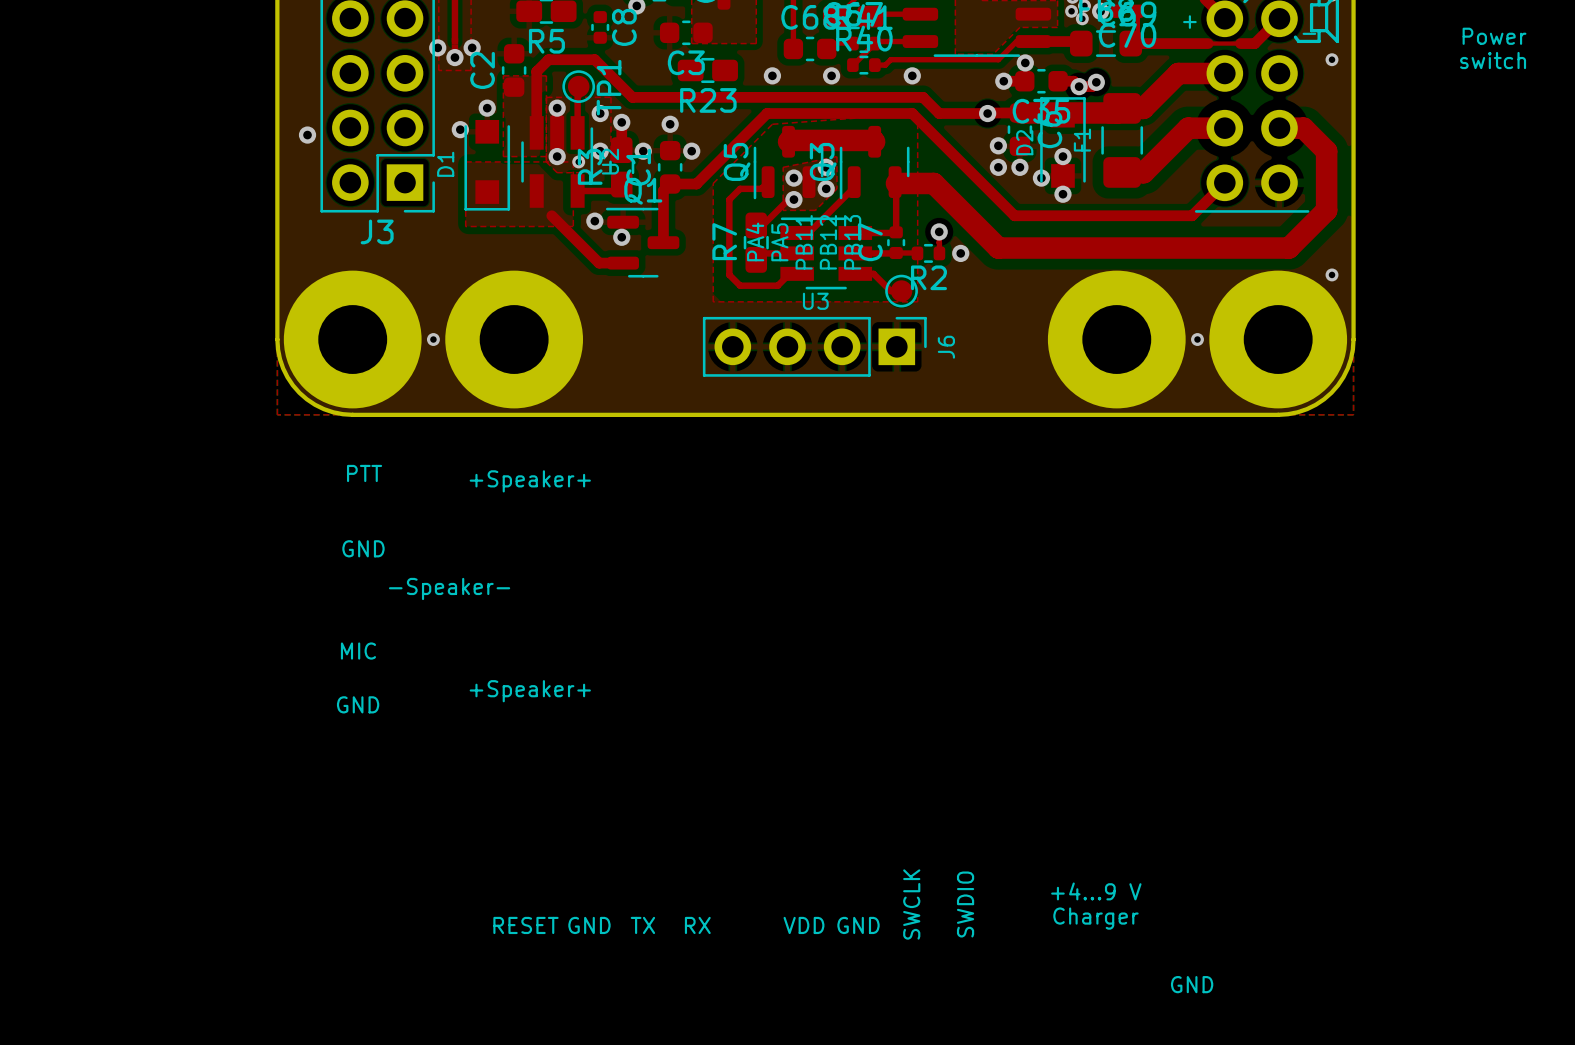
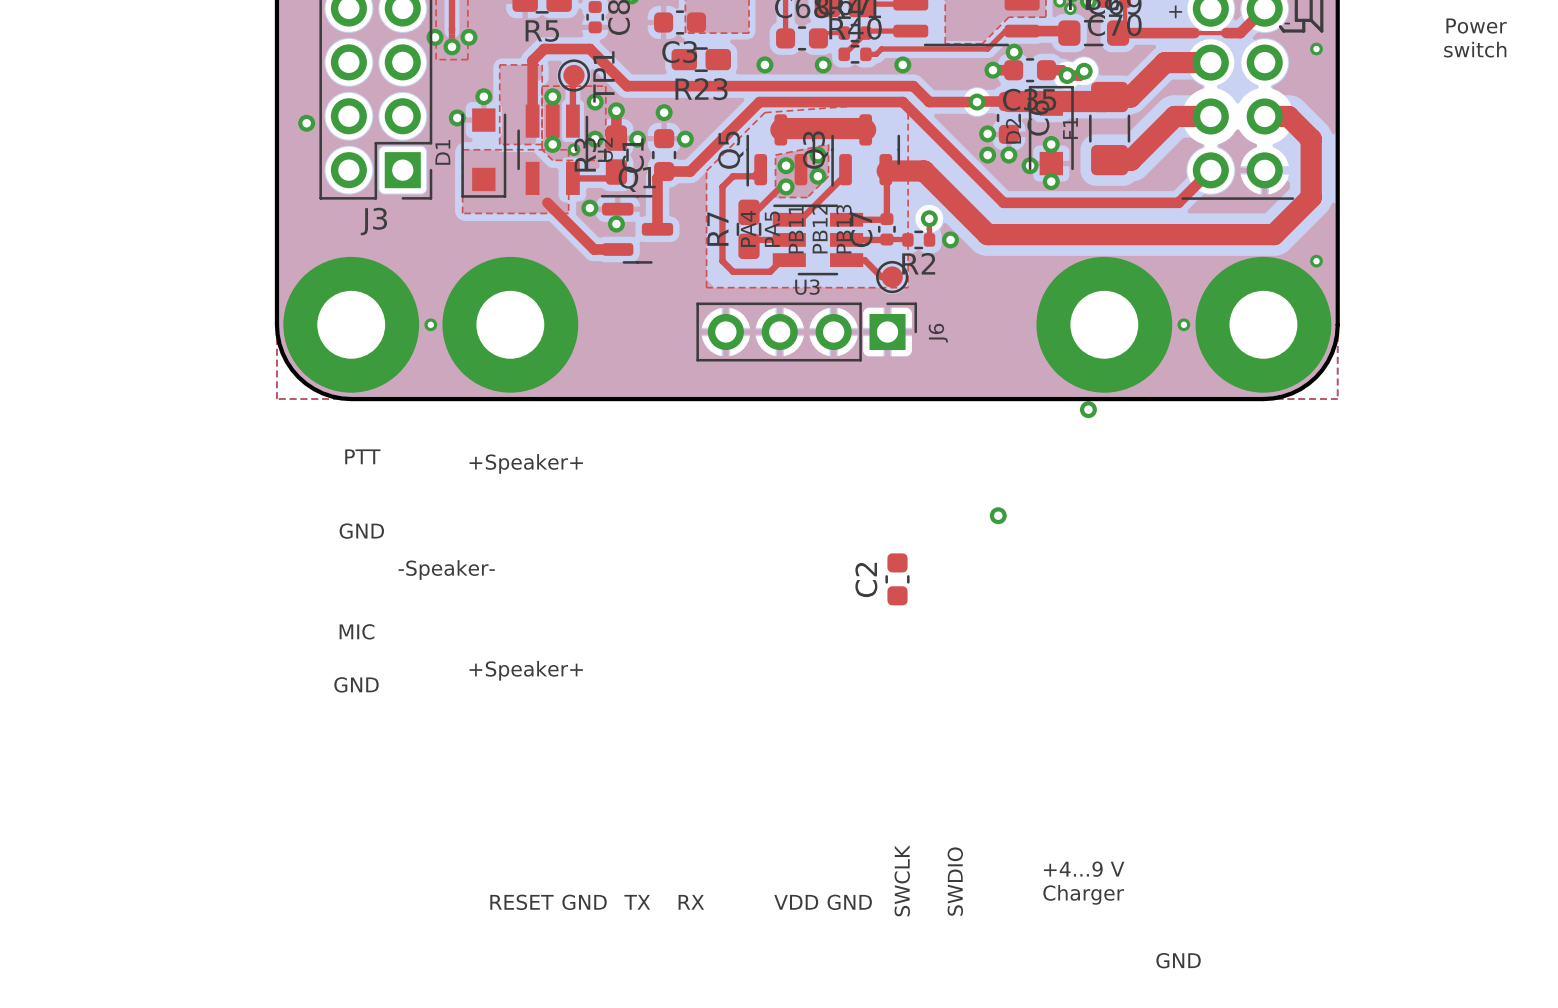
C2 position: (514, 70) -> (897, 579)
via: none -> (1088, 409)
via: none -> (998, 515)

